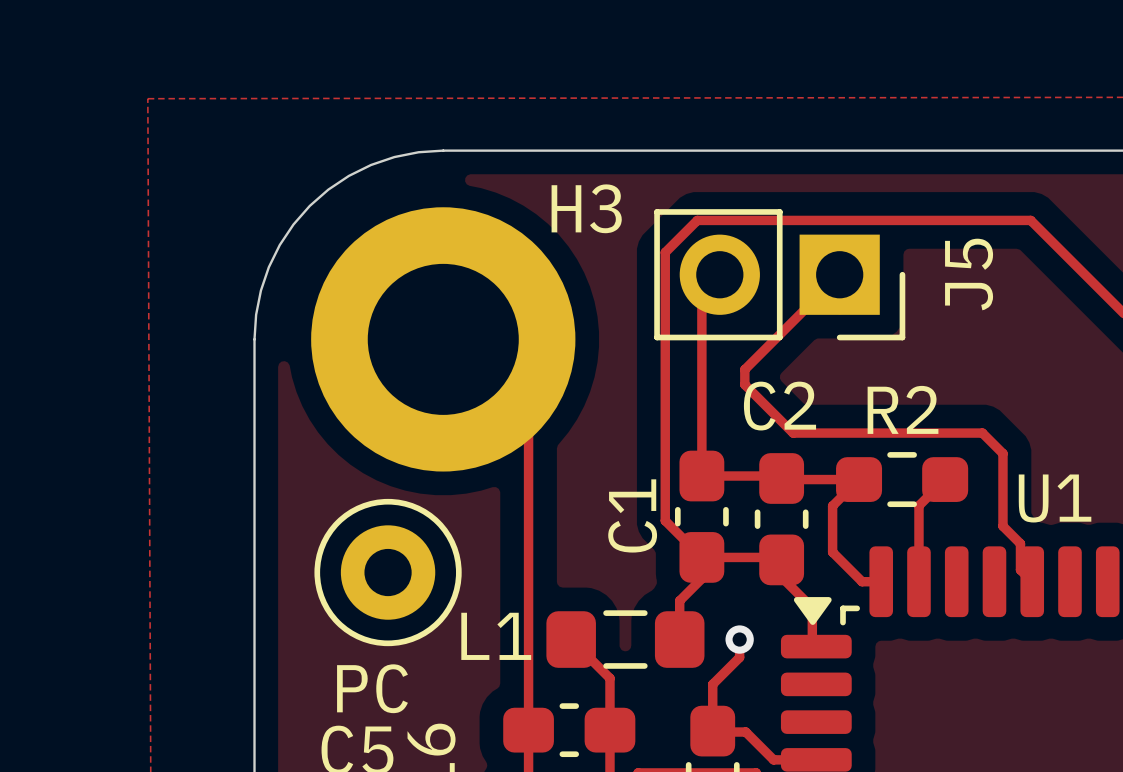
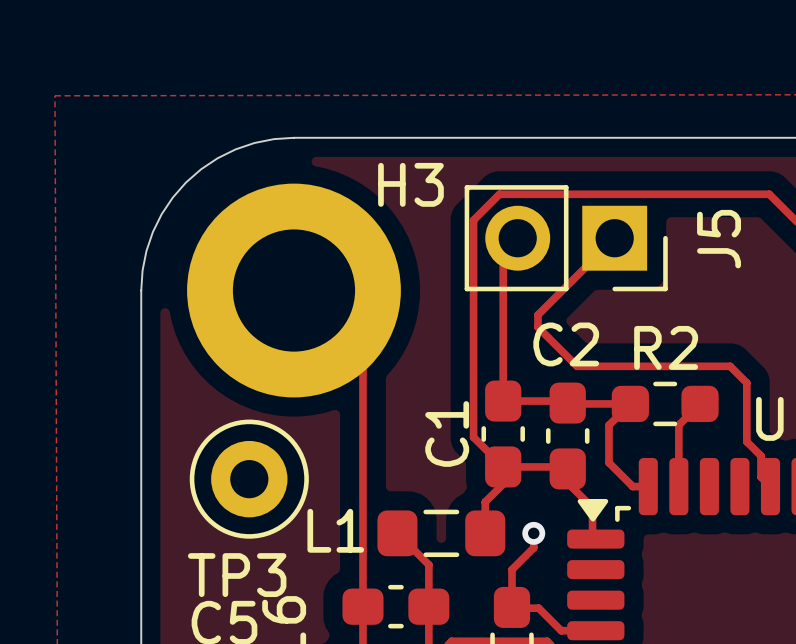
PC name: PC (372, 688) -> TP3 (237, 575)

